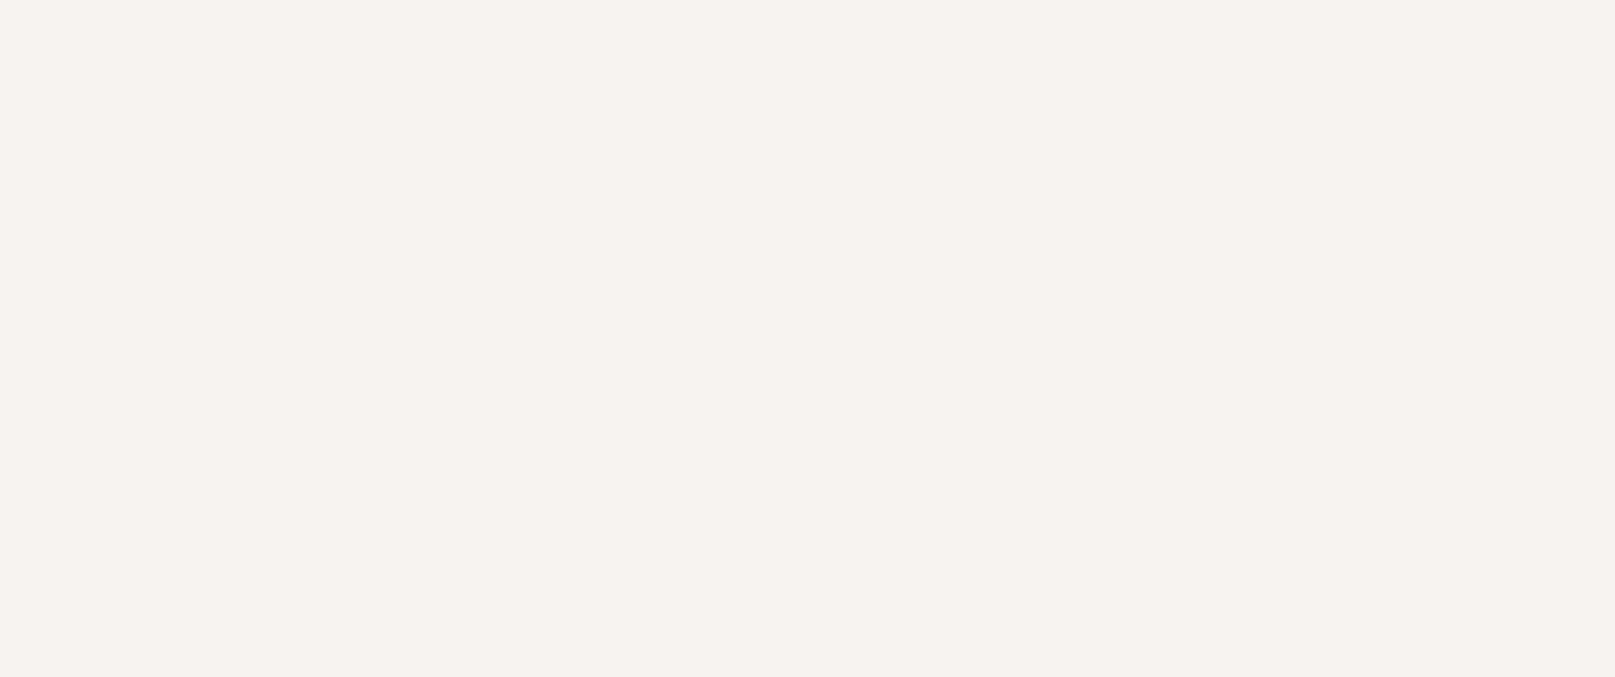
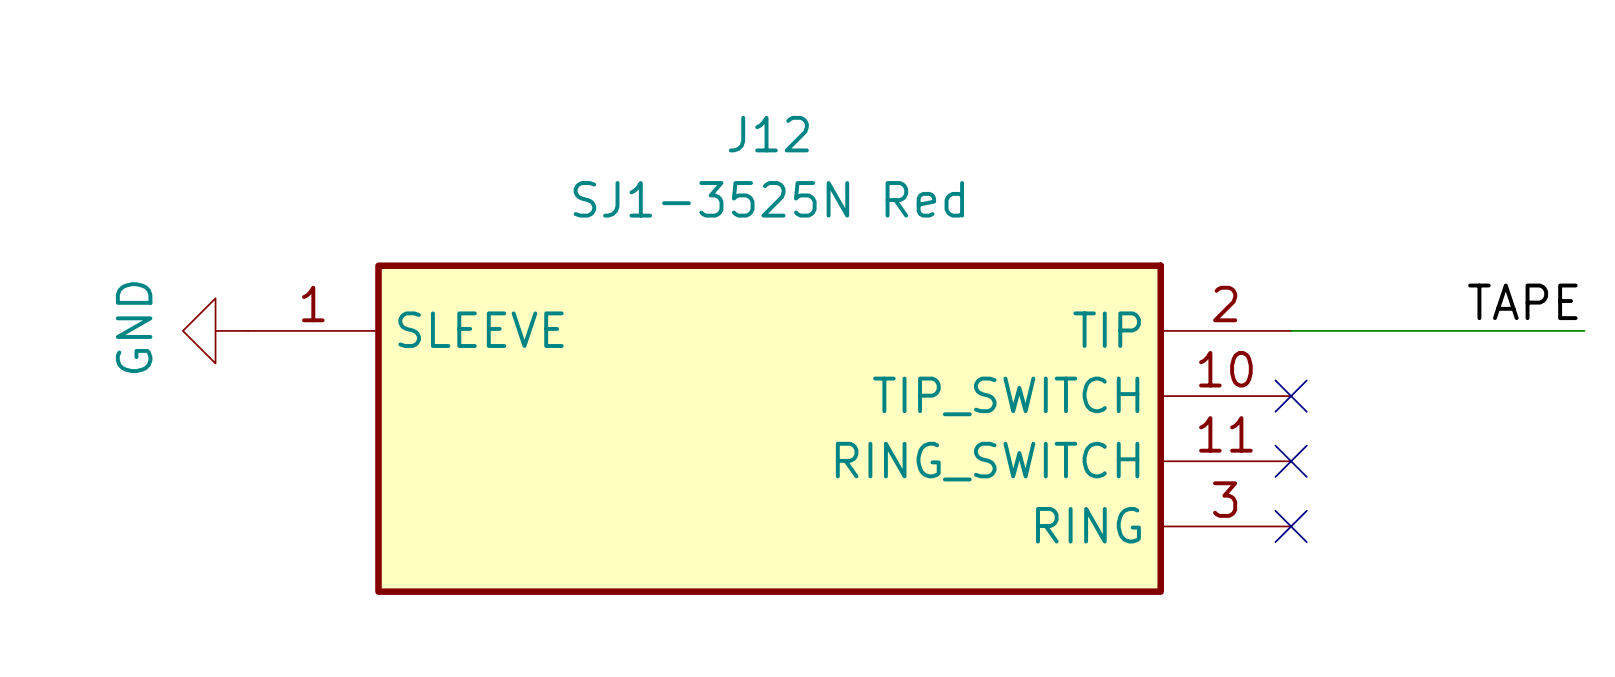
label: none -> TAPE (1522, 301)
power symbol: none -> GND (215, 330)
wire: none -> (1291, 330) (1584, 330)
no-connect mark: none -> (1291, 396)
J12: none -> SJ1-3525N Red (769, 428)
no-connect mark: none -> (1291, 461)
no-connect mark: none -> (1291, 526)

